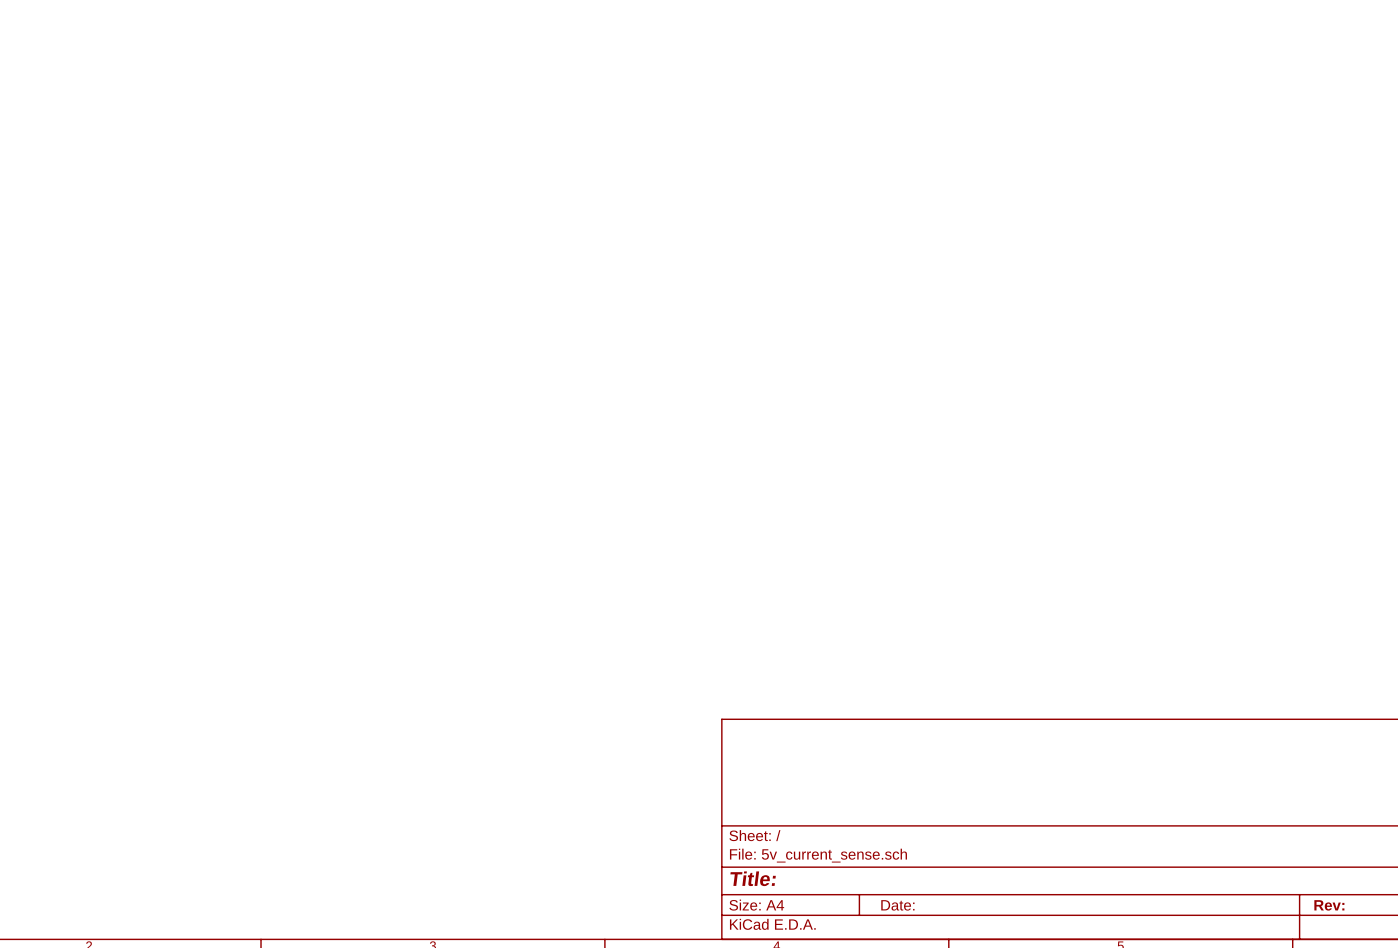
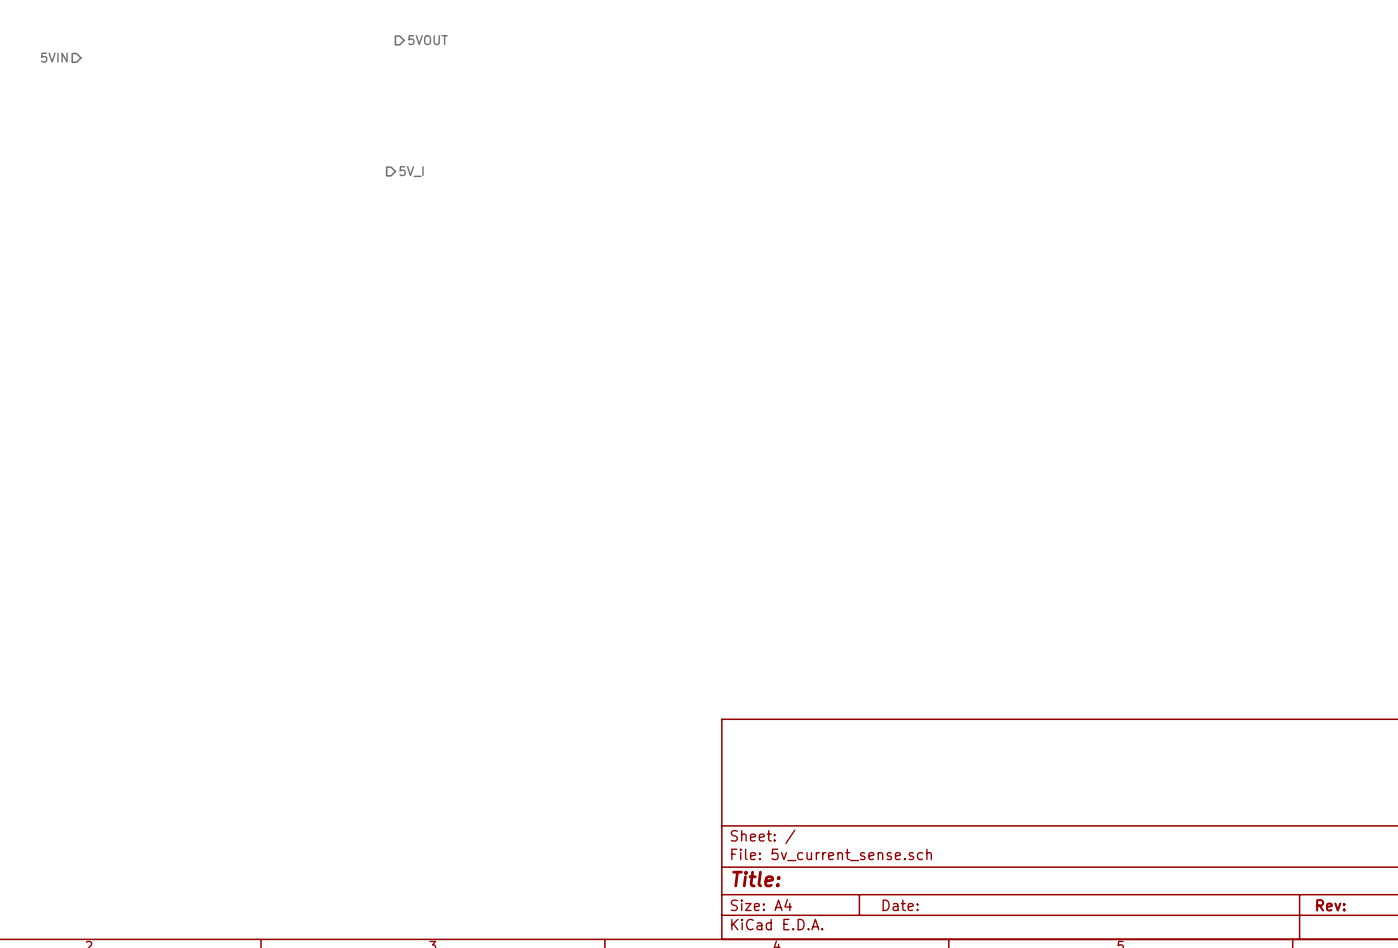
hierarchical label: none -> 5VOUT (427, 40)
hierarchical label: none -> 5VIN (54, 57)
hierarchical label: none -> 5V_I (411, 171)

